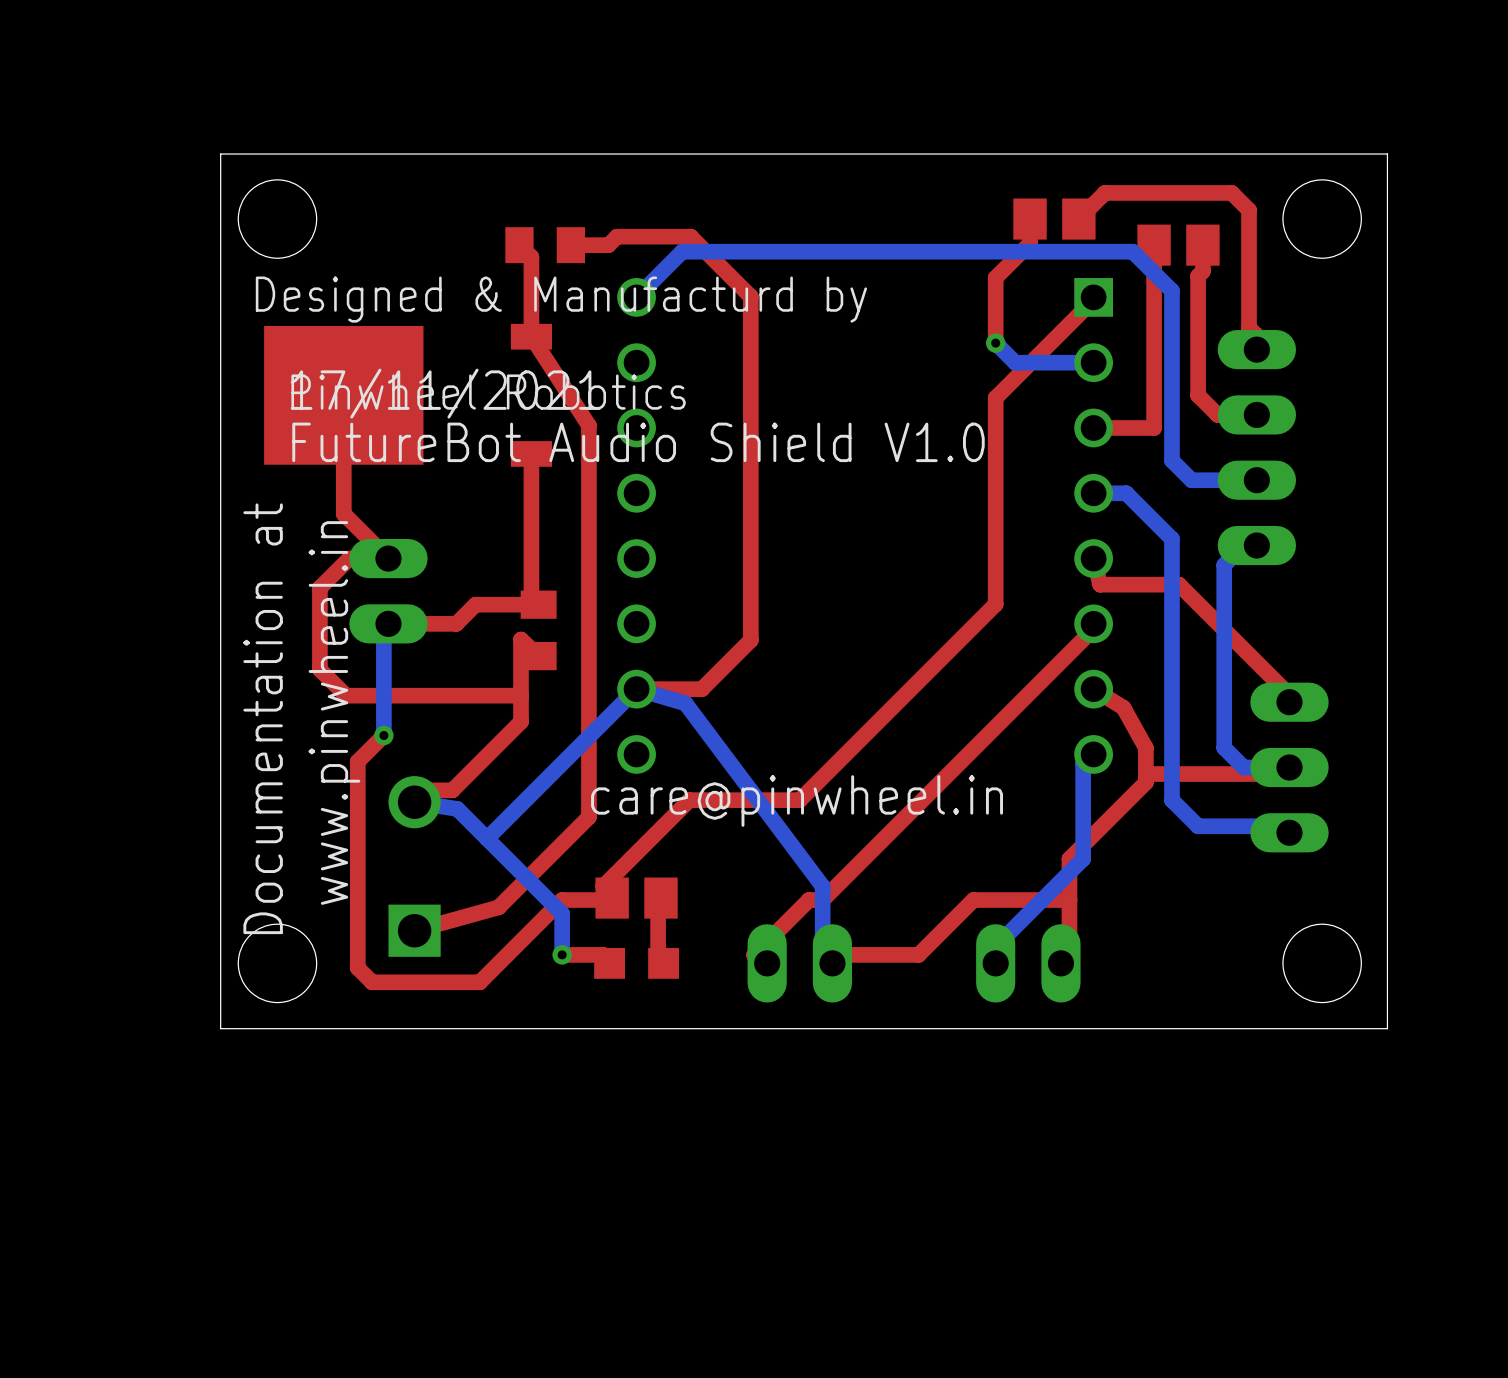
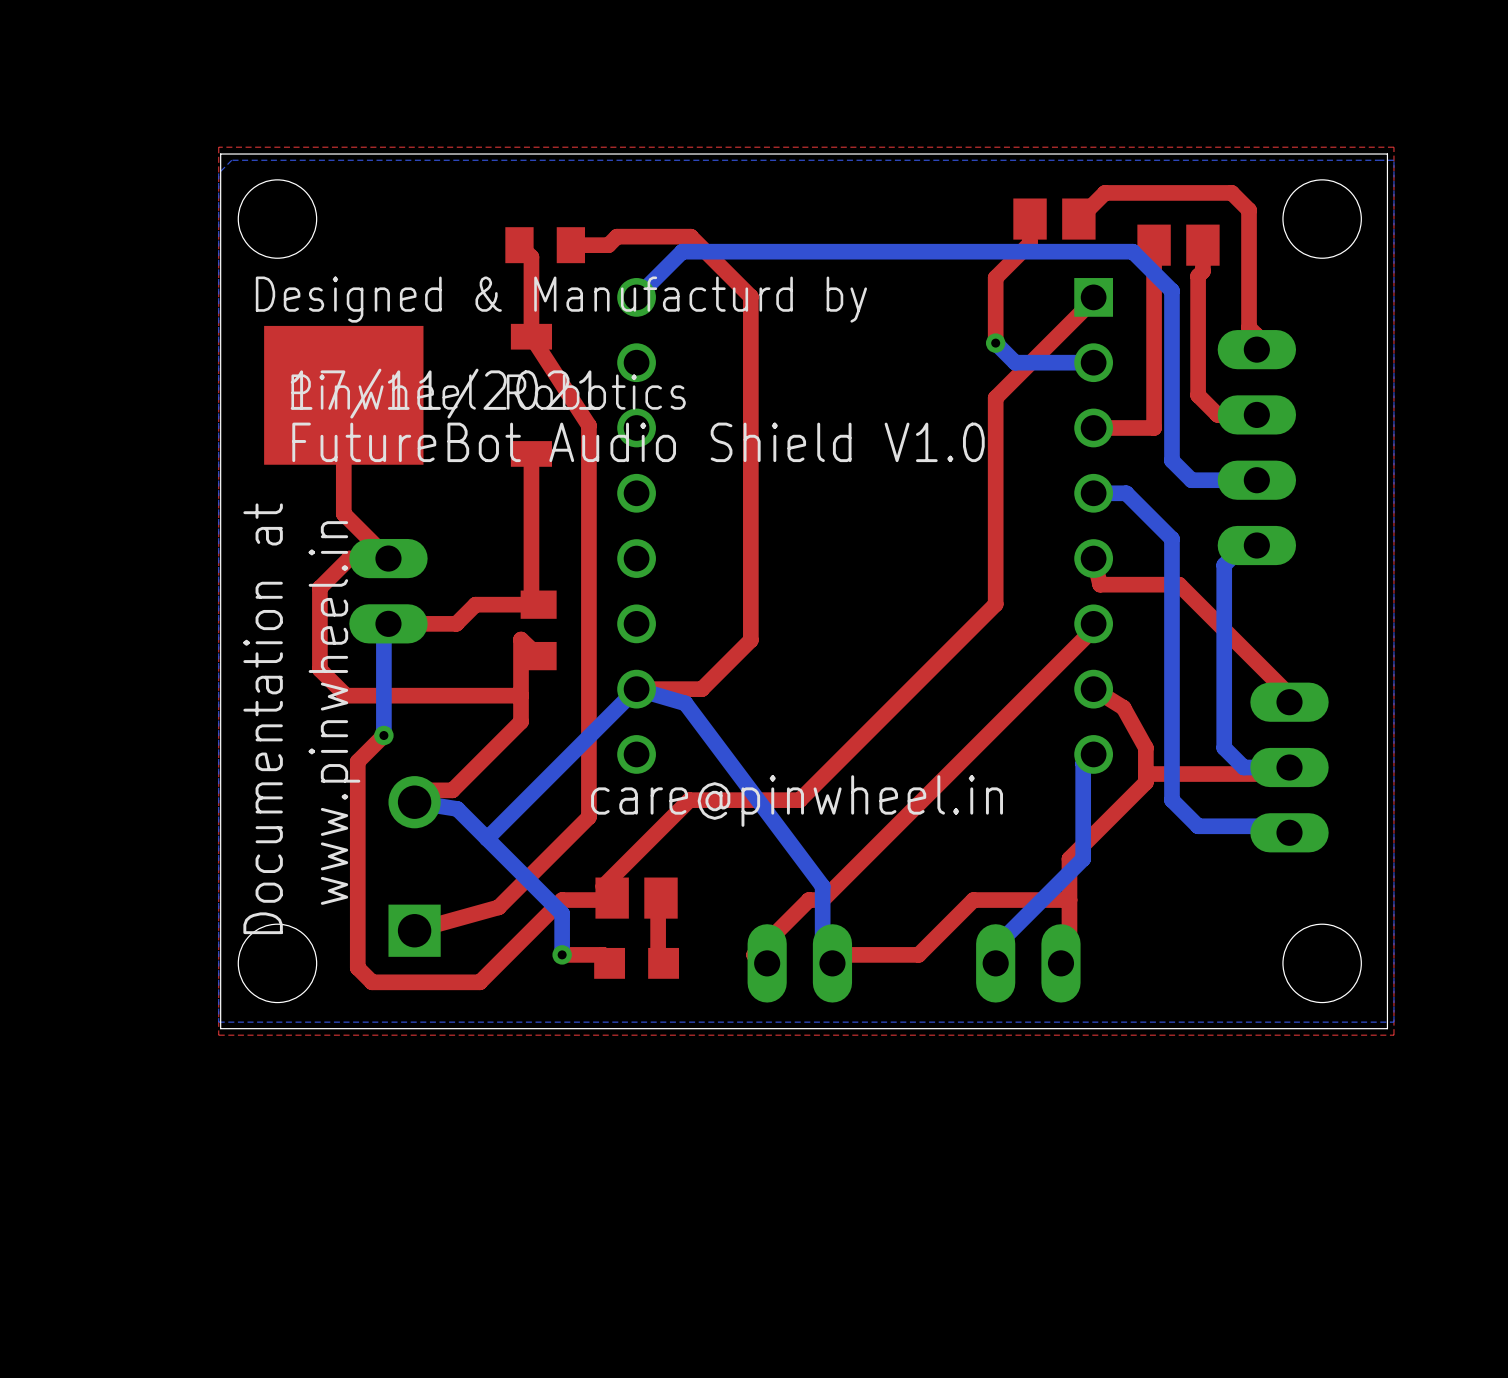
top zone outline: none -> (1393, 147) (218, 147) (218, 1035) (1393, 1035) (1393, 147)
bottom zone outline: none -> (1393, 160) (231, 160) (218, 173) (218, 1022) (1393, 1022) (1393, 160)

